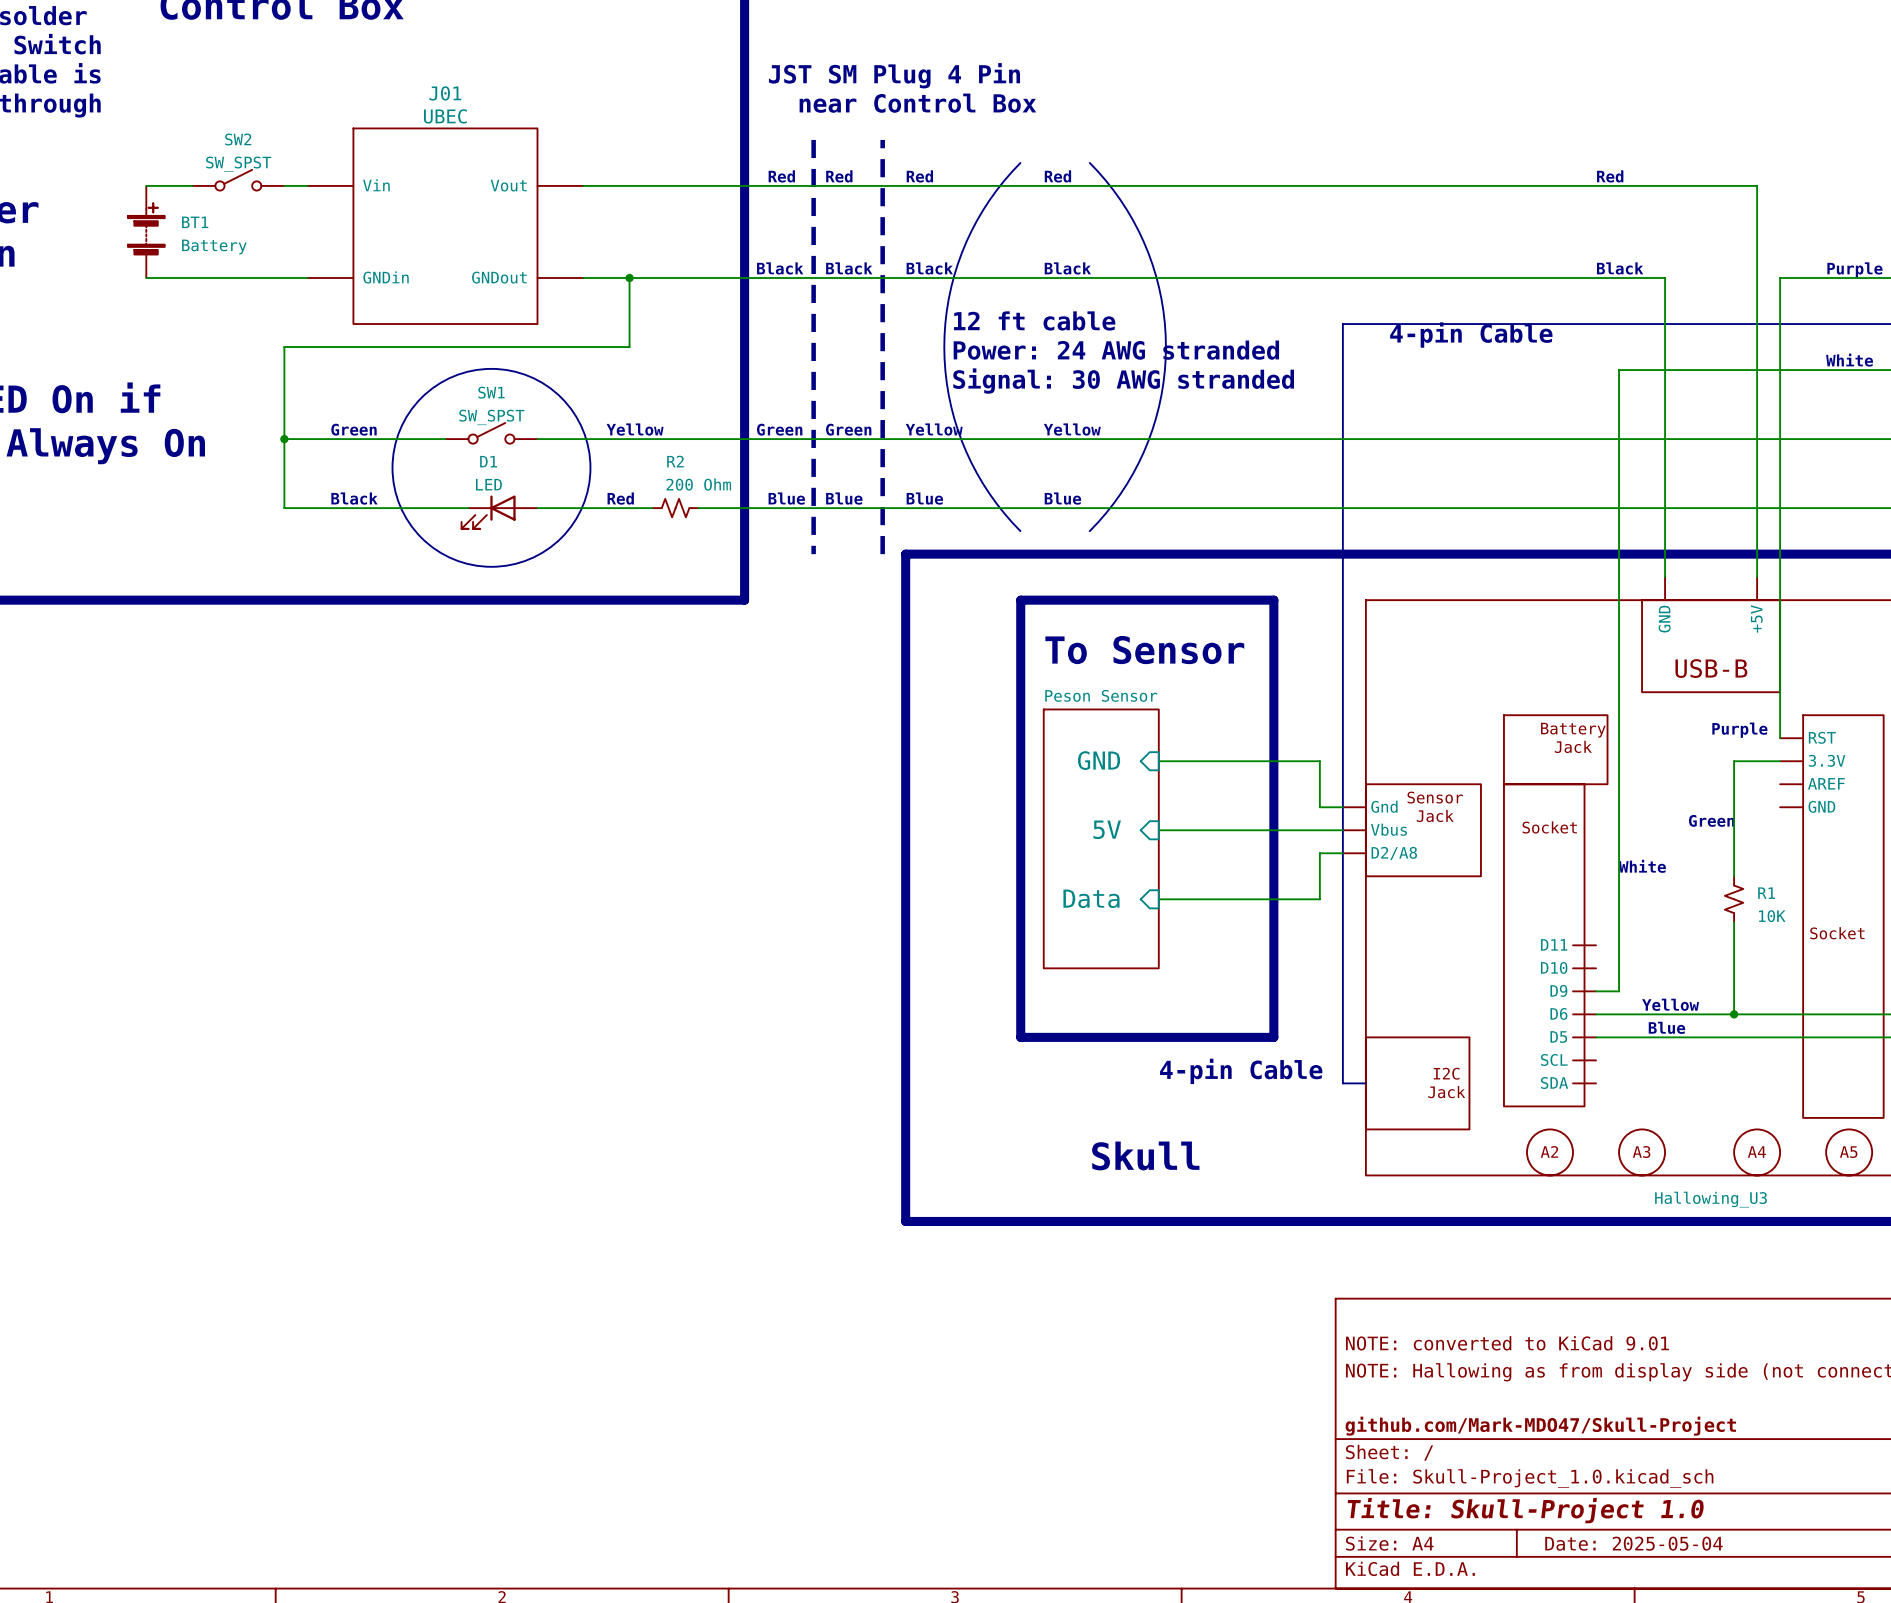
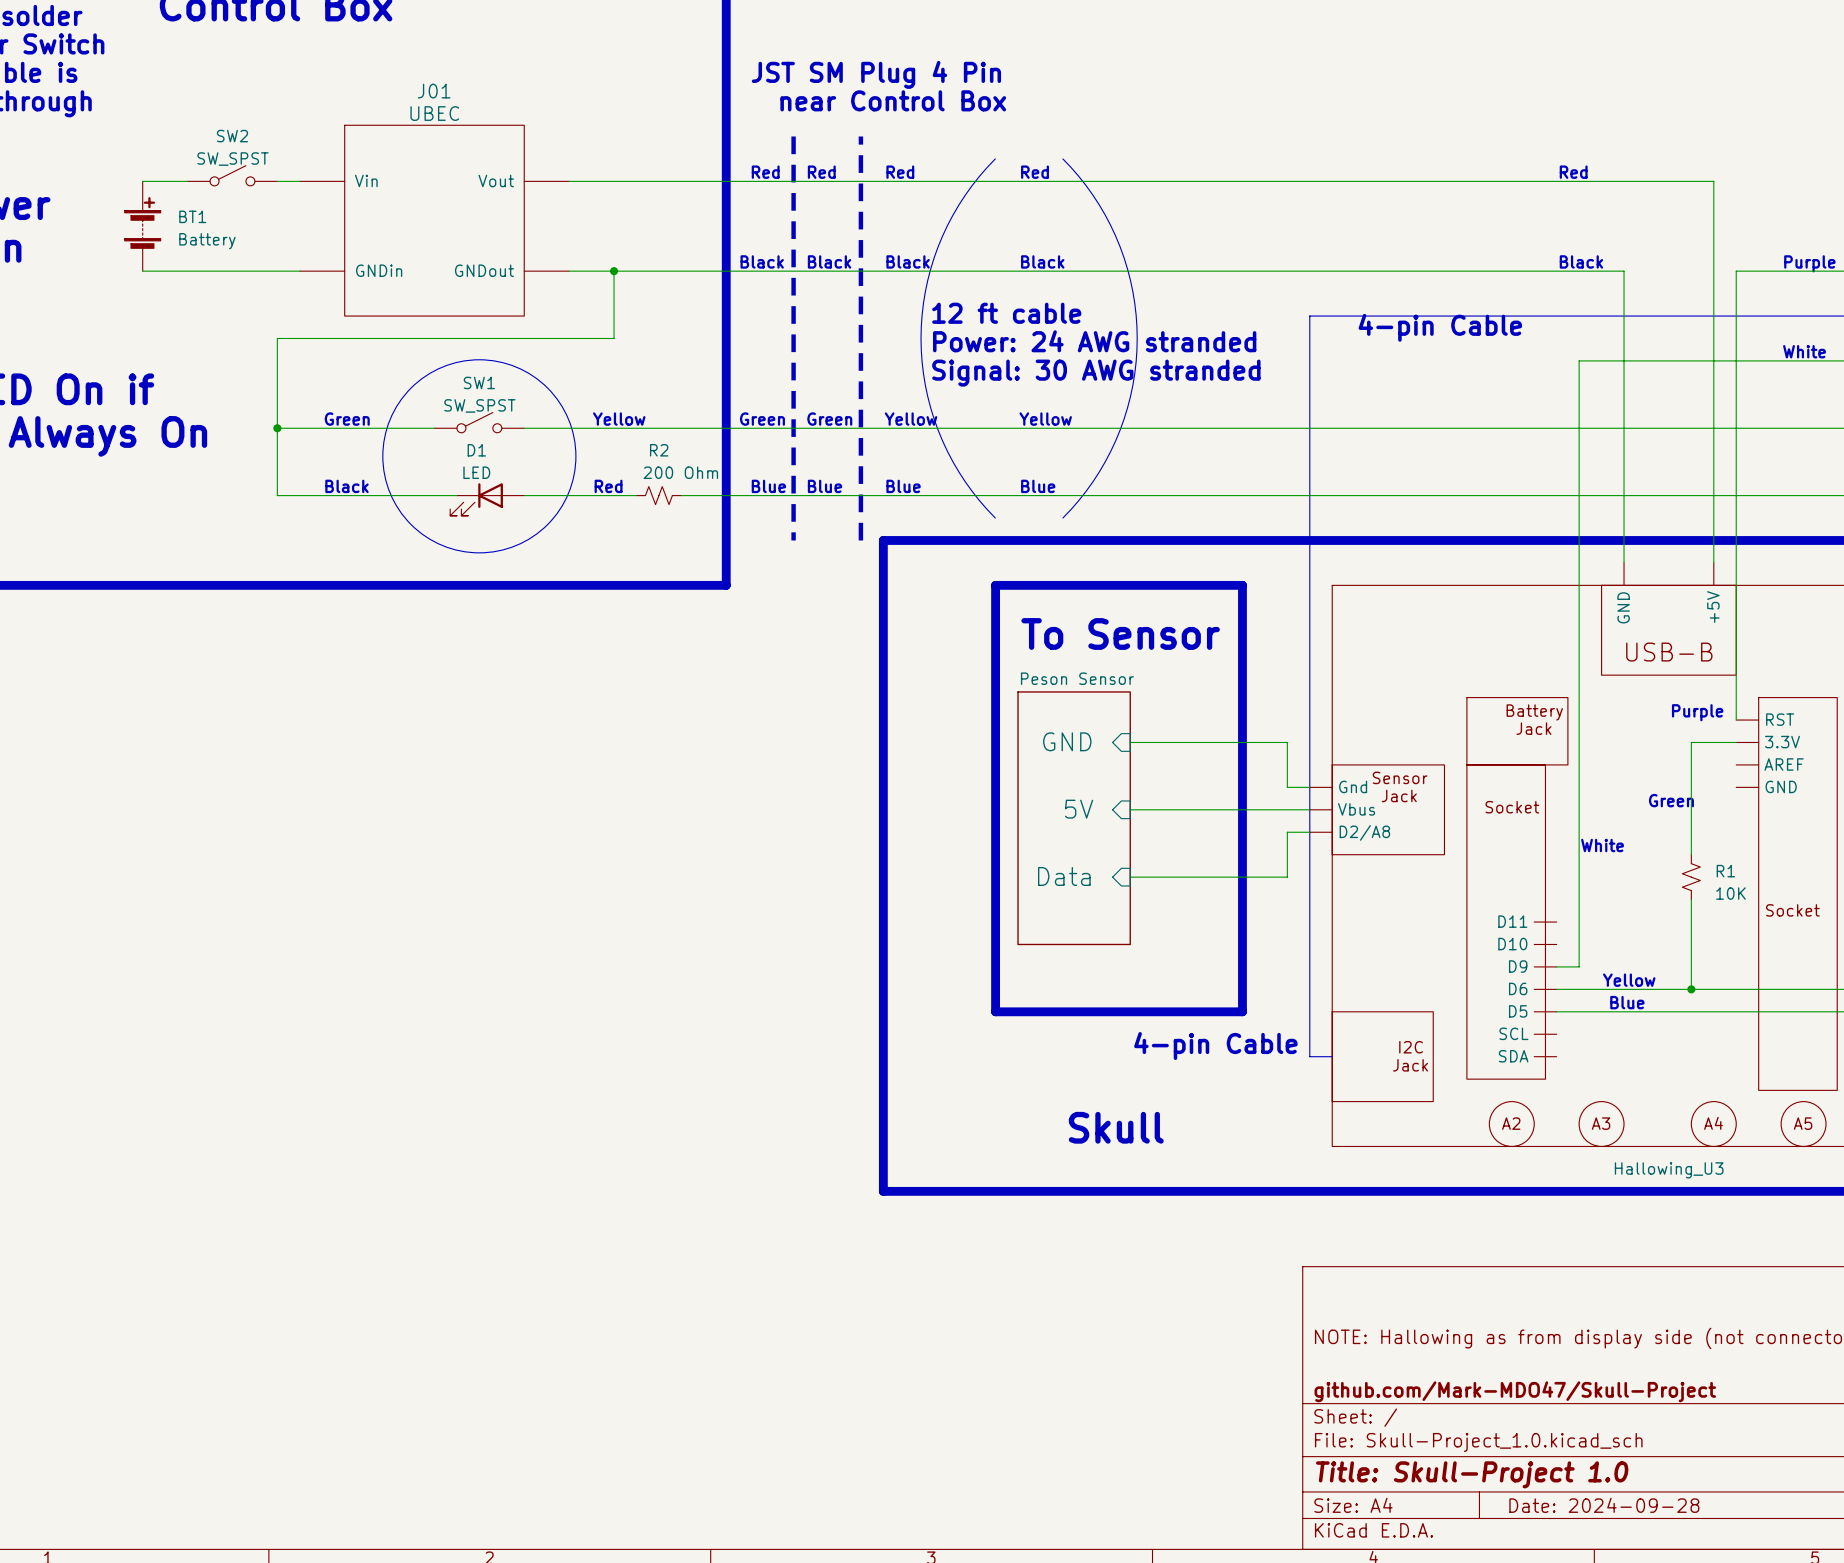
title block: NOTE: converted to KiCad 9.01 (1507, 1343) -> none
title block: Date: 2025-05-04 (1633, 1543) -> Date: 2024-09-28 (1604, 1505)

